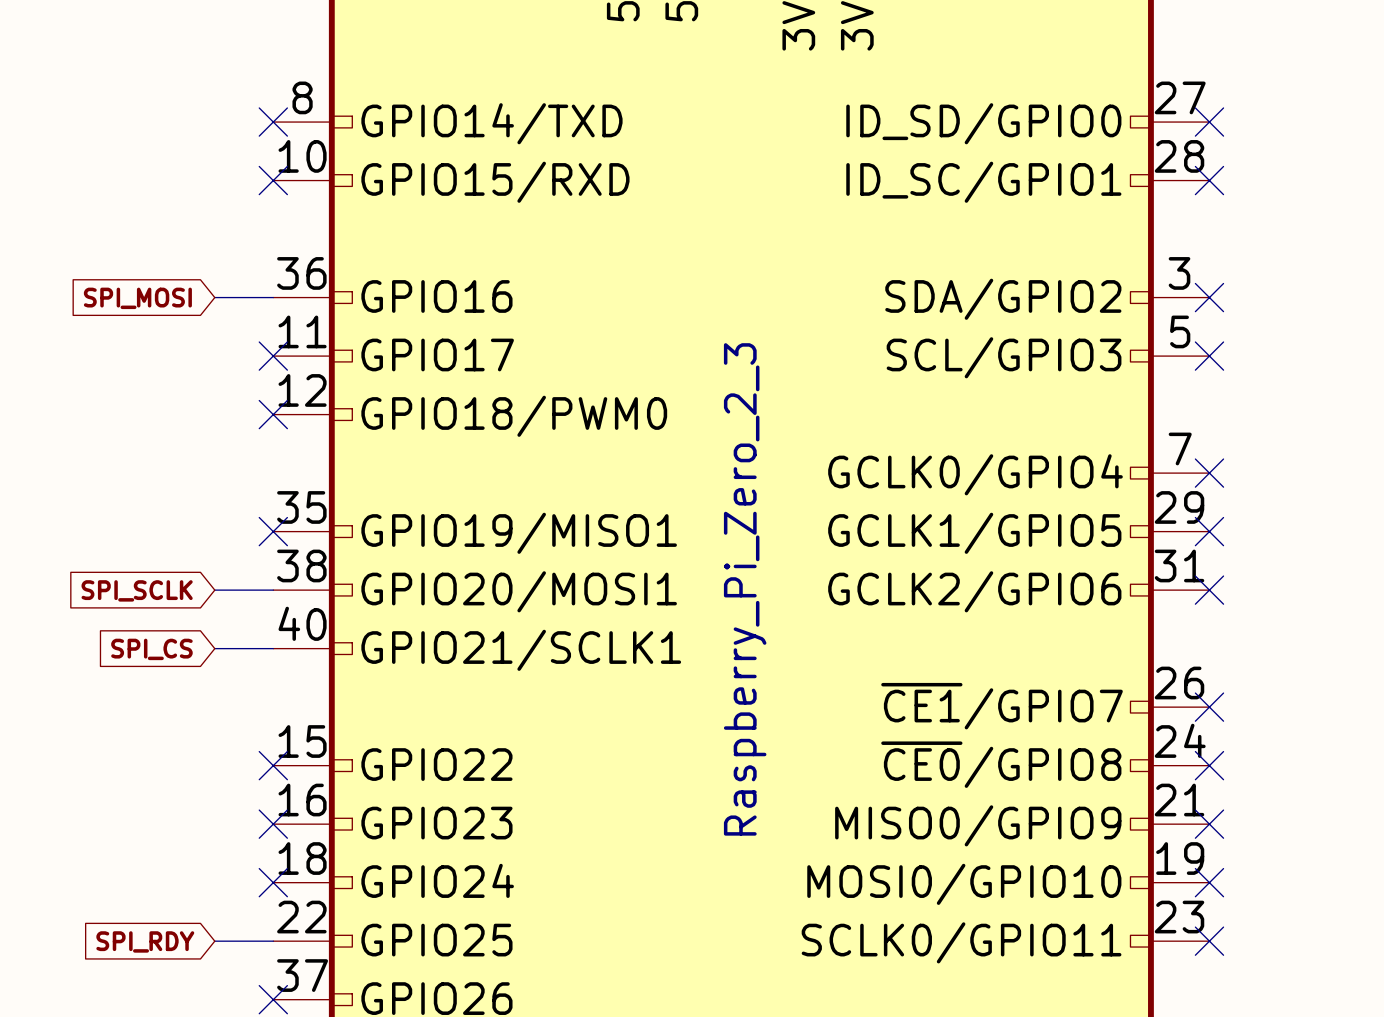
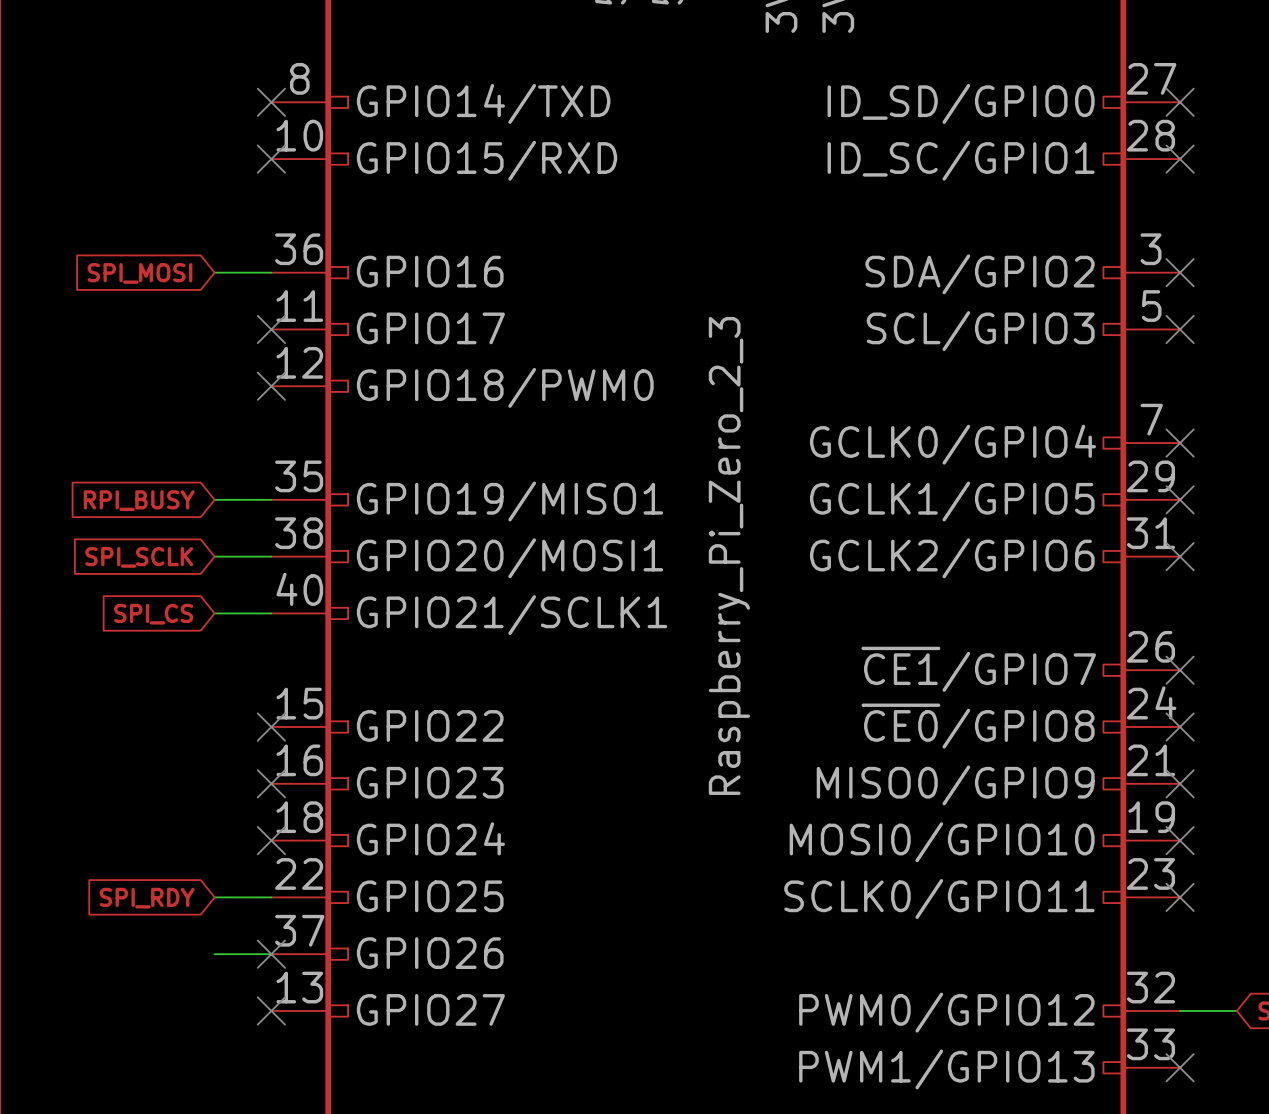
wire: none -> (214, 499) (271, 499)
no-connect mark: (273, 531) -> none
global label: none -> RPI_BUSY (139, 500)
wire: none -> (214, 954) (271, 954)

